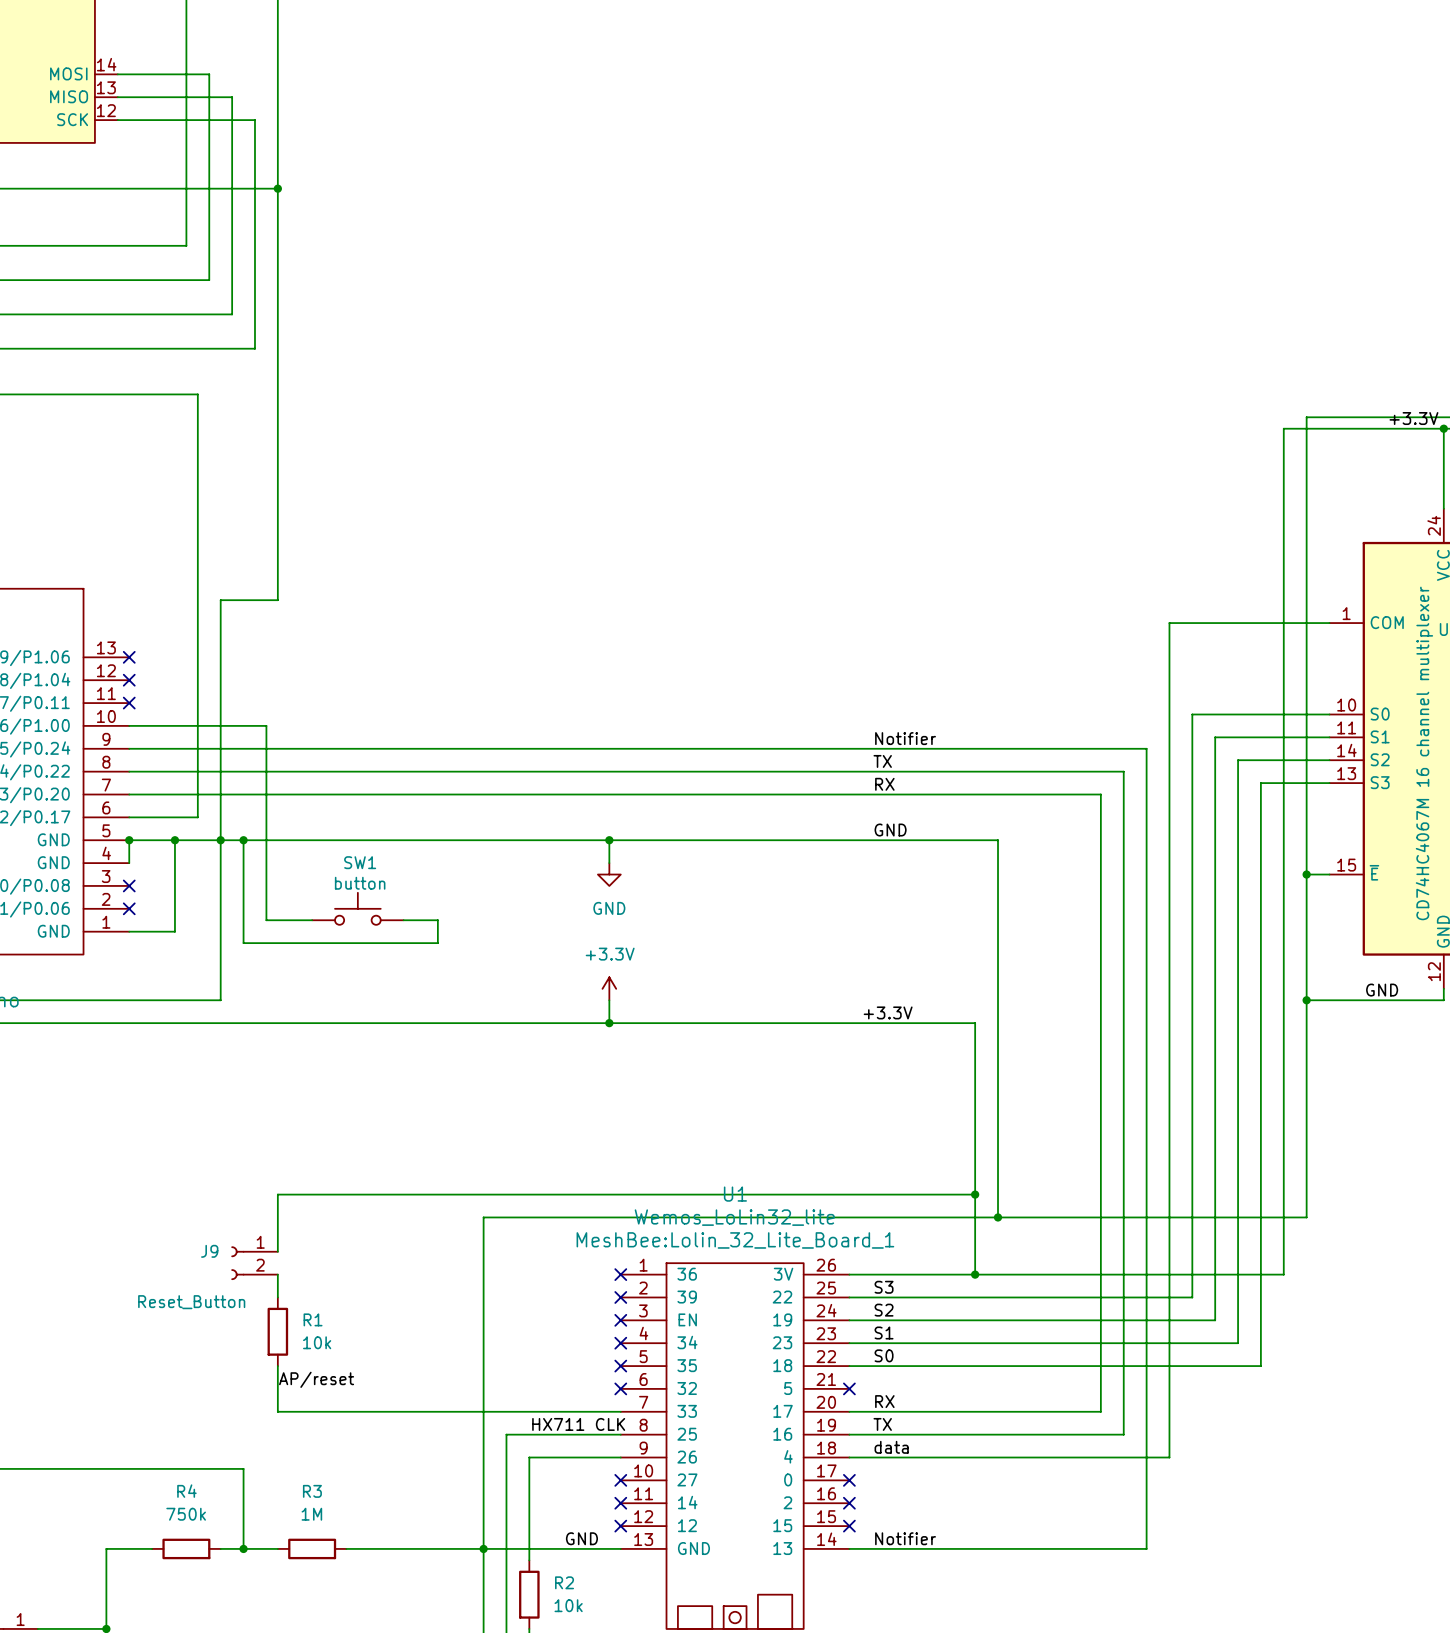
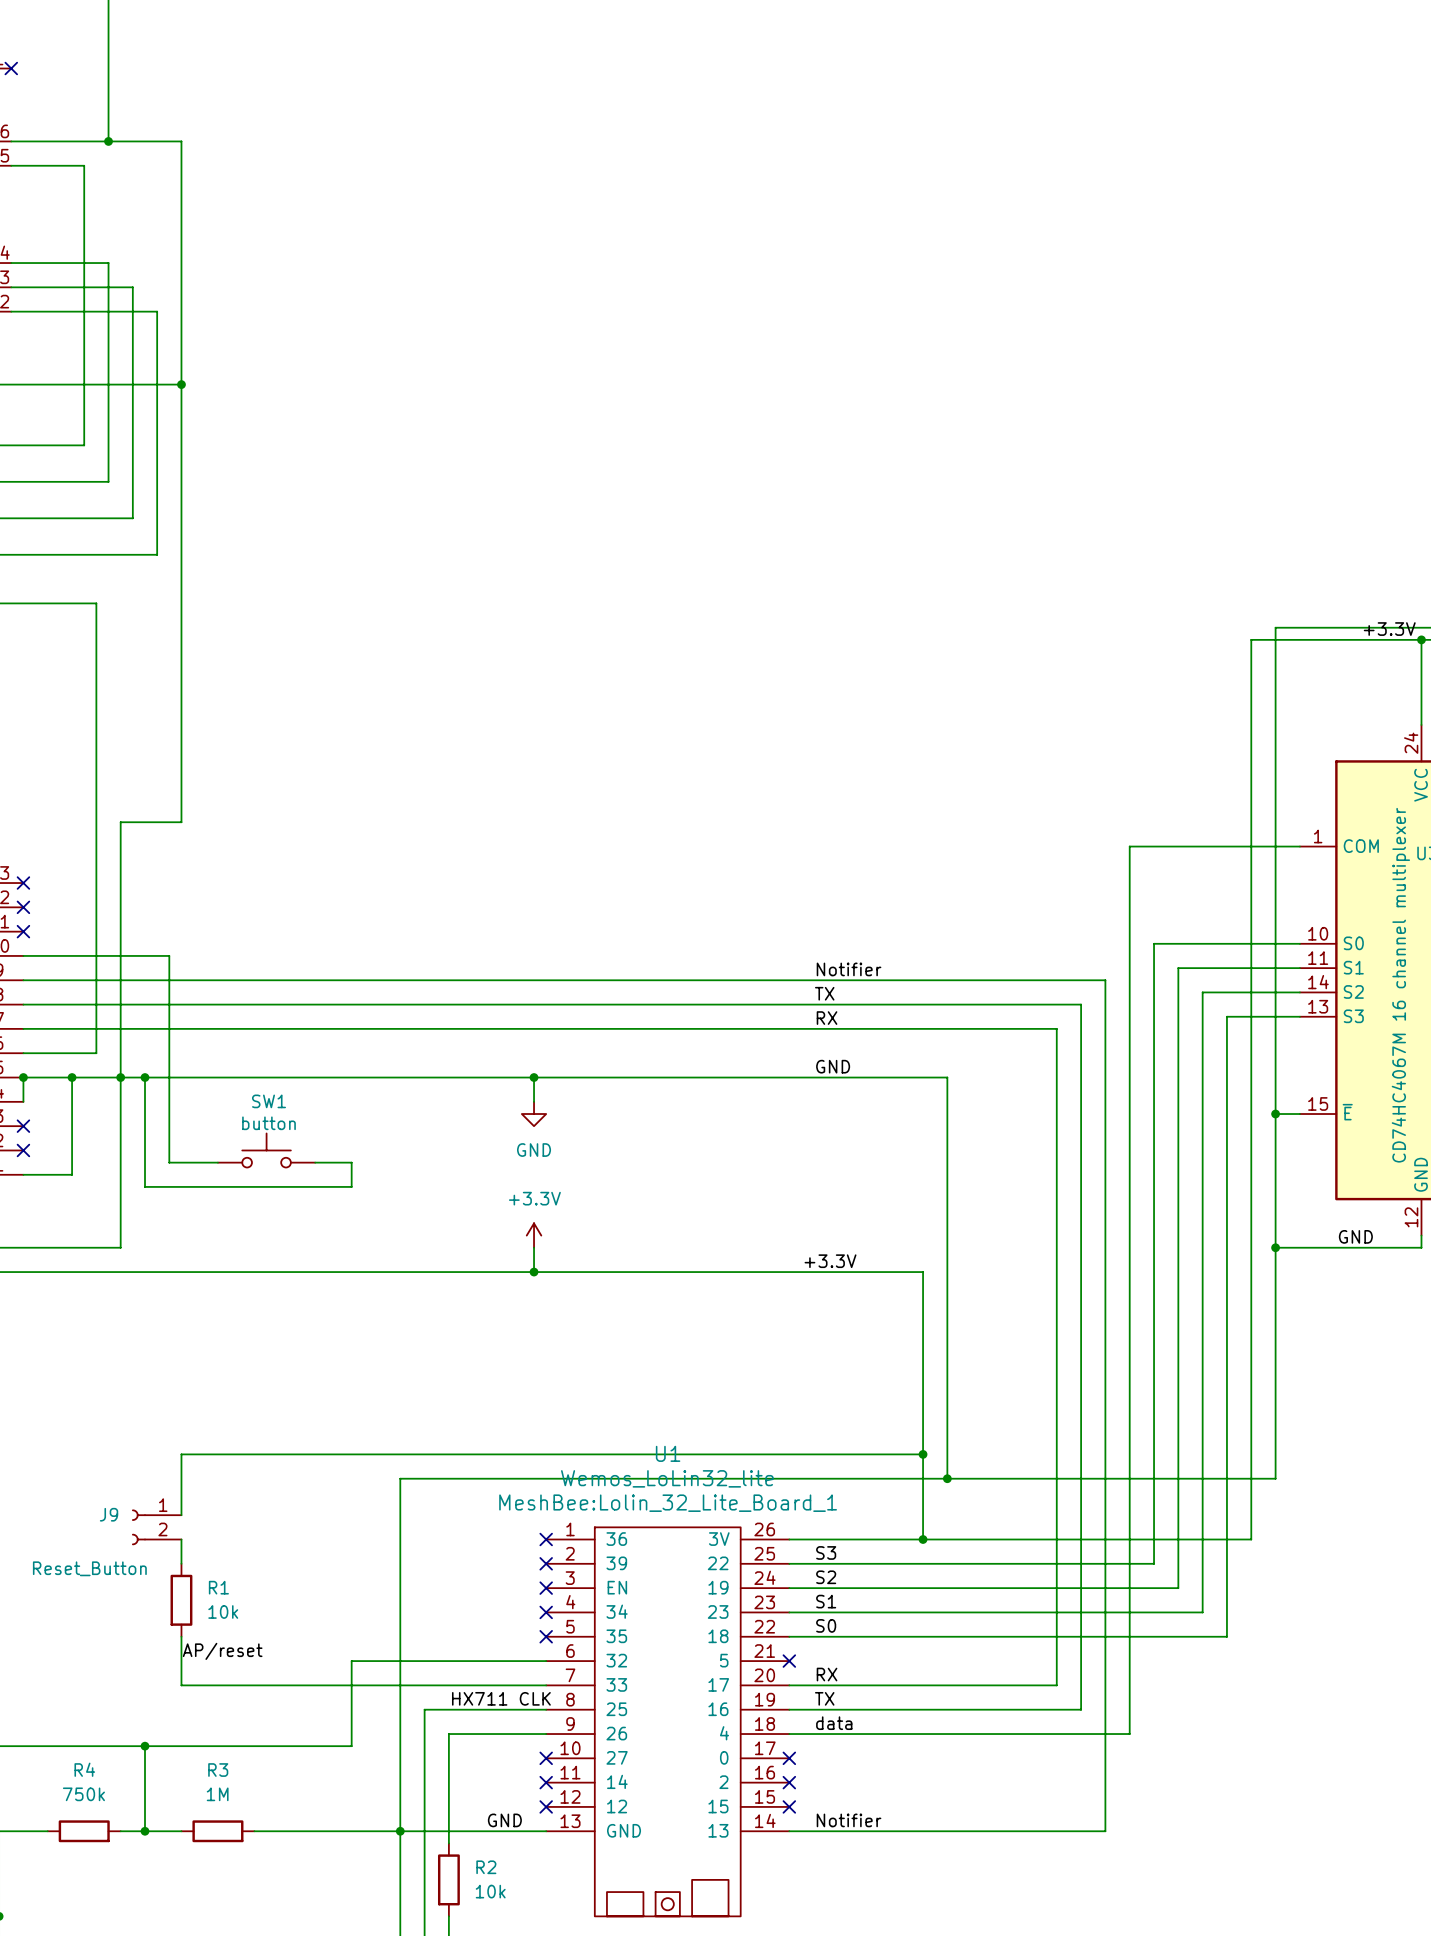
wire: none -> (546, 1661) (351, 1661) (351, 1746) (145, 1746)
no-connect mark: (620, 1388) -> none
junction: none -> (145, 1746)

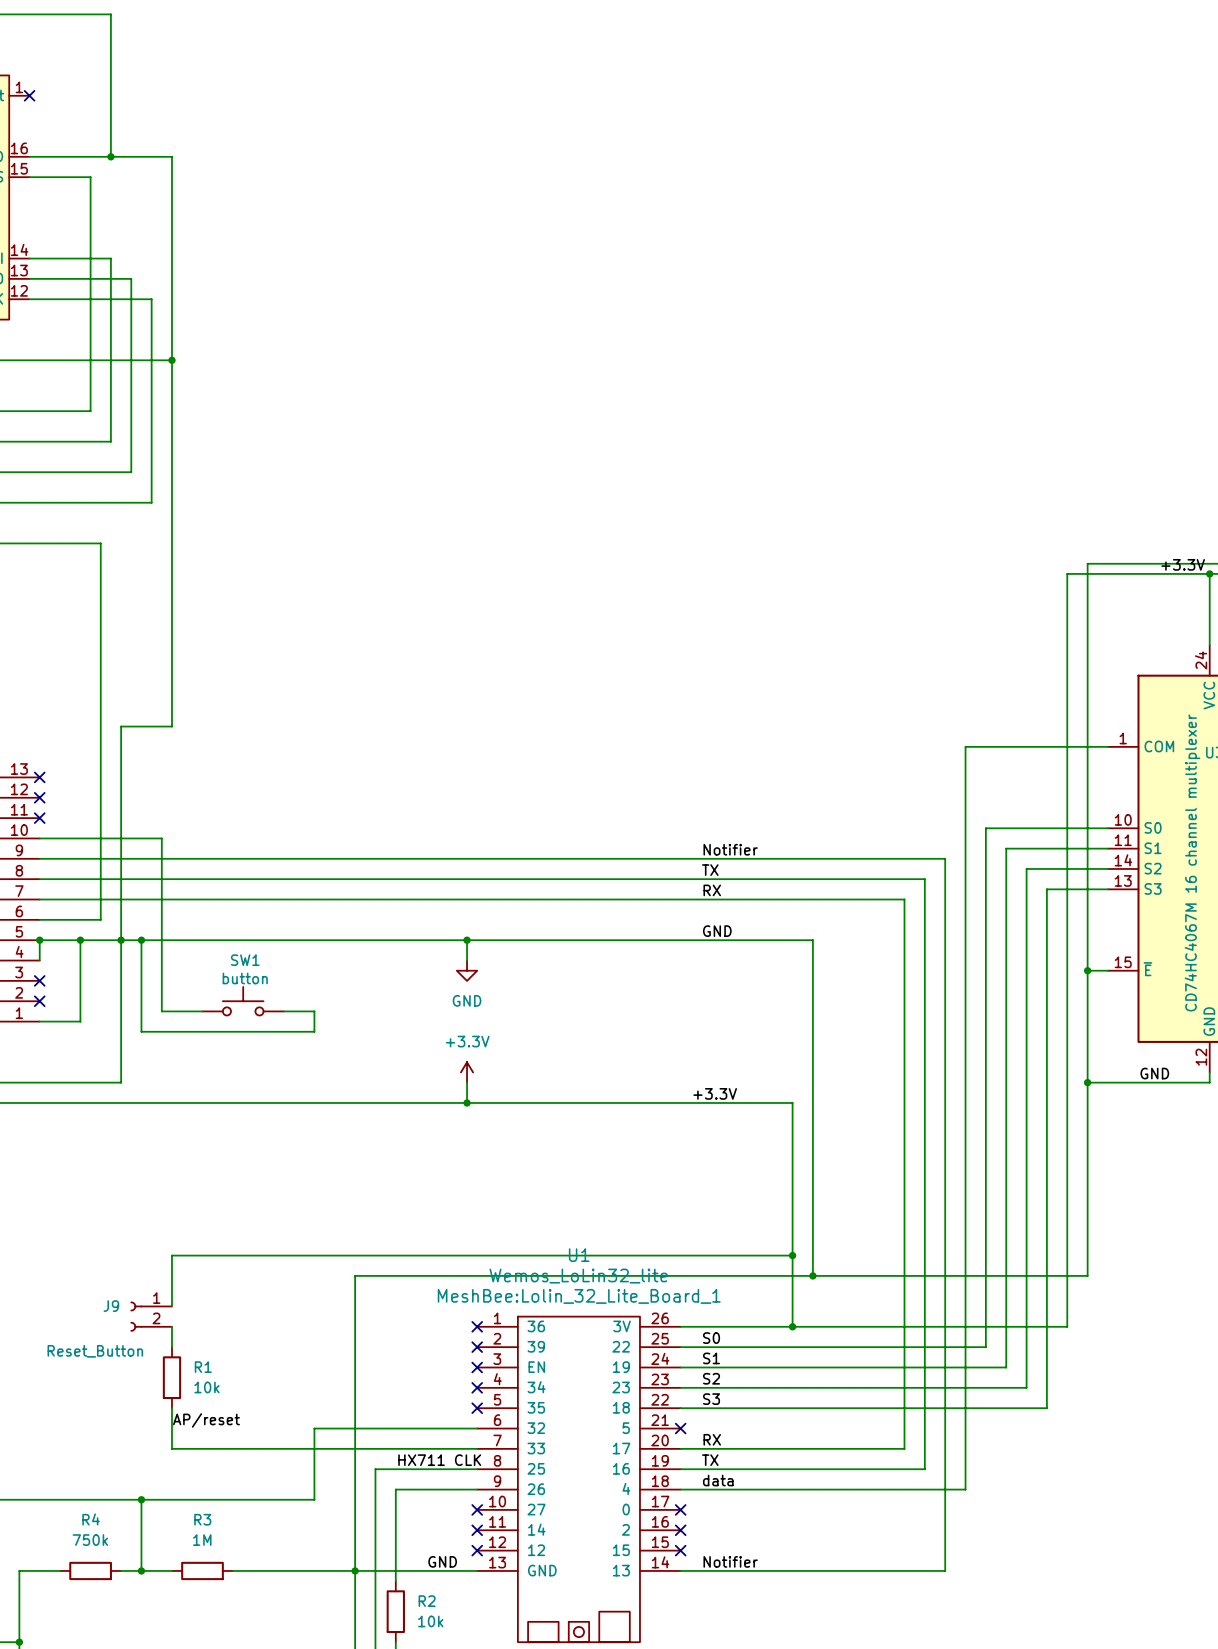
label: S3 (826, 1552) -> S0 (711, 1338)
label: S2 (826, 1577) -> S1 (711, 1358)
label: S1 (826, 1601) -> S2 (711, 1378)
label: S0 (826, 1625) -> S3 (711, 1399)

